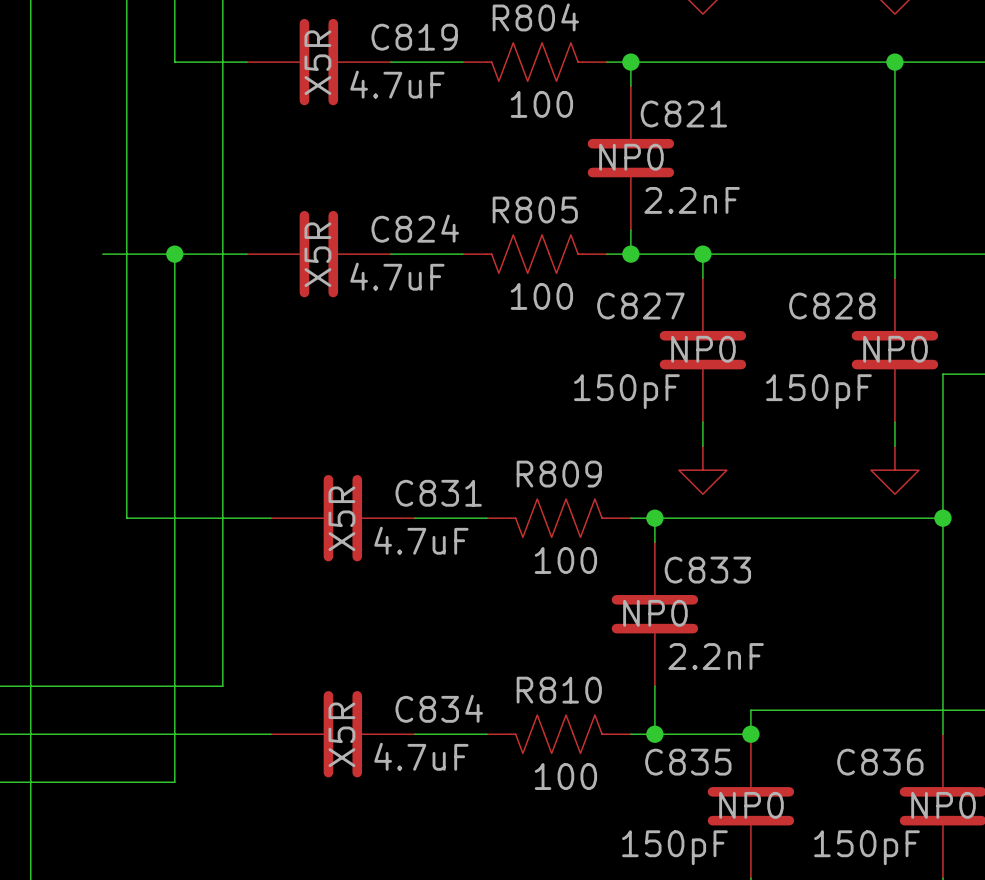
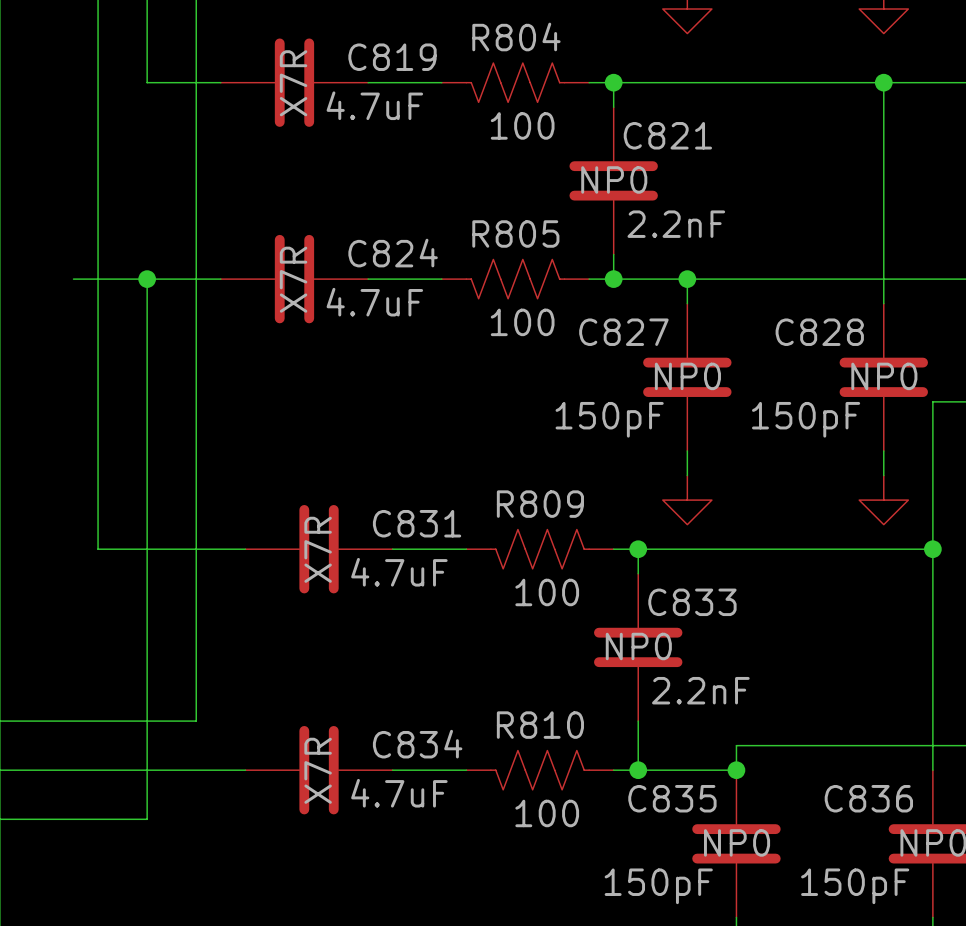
C819 text: X5R (317, 62) -> X7R (293, 83)
C824 text: X5R (317, 254) -> X7R (293, 279)
C831 text: X5R (341, 518) -> X7R (318, 549)
C834 text: X5R (341, 734) -> X7R (318, 770)

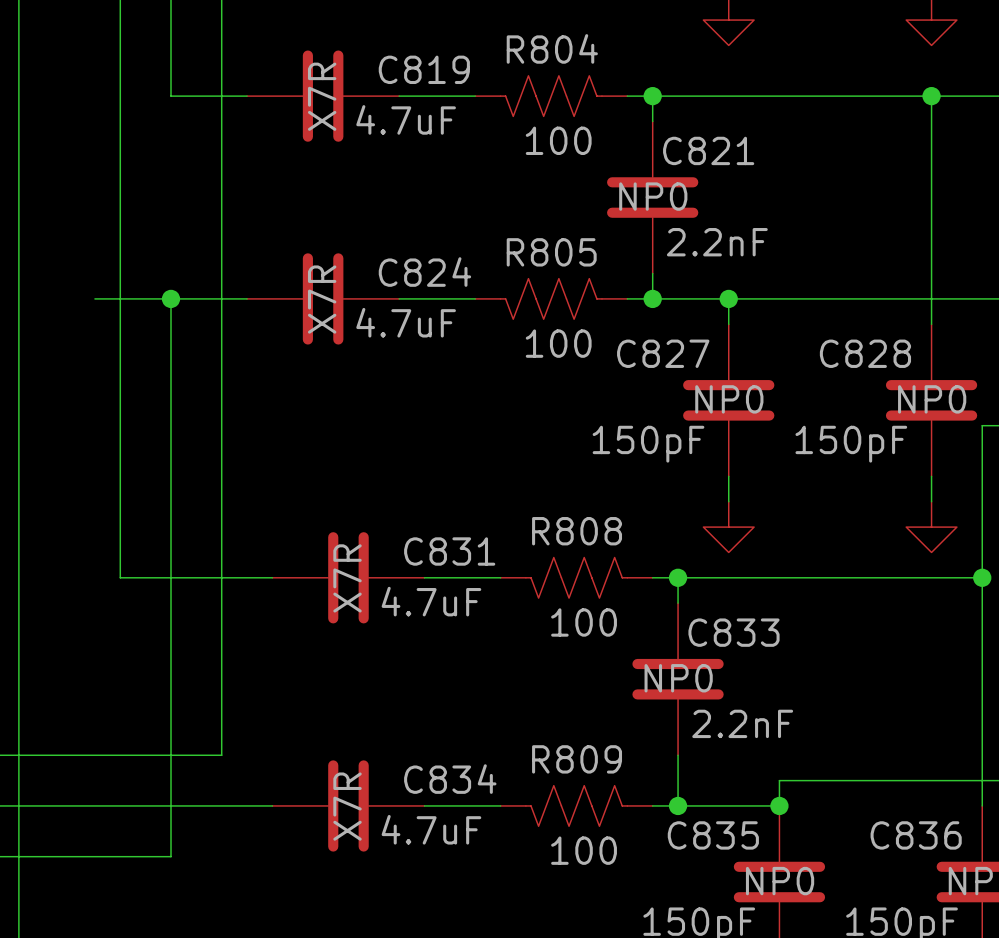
R809 name: R809 (540, 504) -> R808 (577, 531)
R810 name: R810 (540, 725) -> R809 (577, 759)

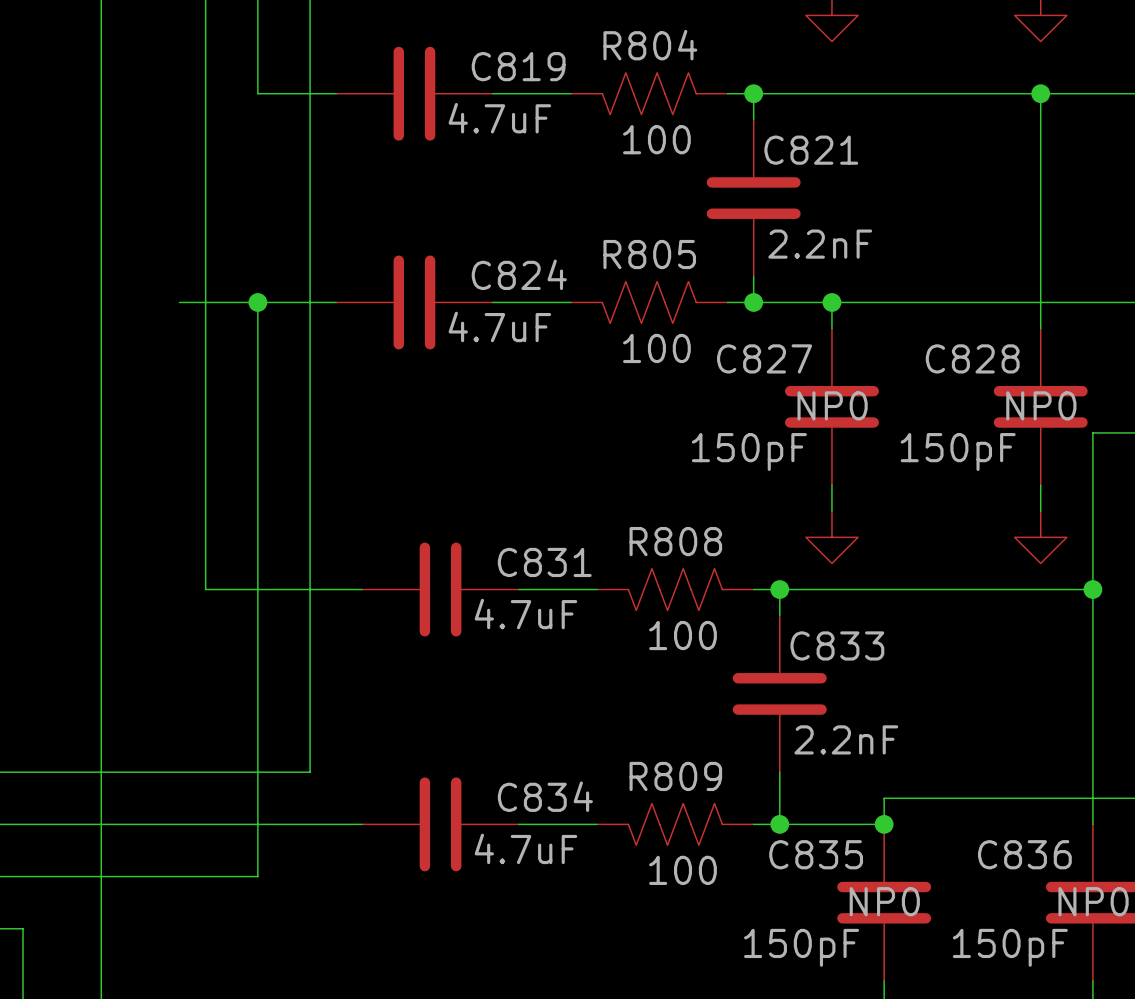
C819 text: X7R (322, 96) -> none
C821 text: NP0 (653, 196) -> none
C824 text: X7R (322, 299) -> none
C831 text: X7R (347, 578) -> none
C833 text: NP0 (678, 678) -> none
C834 text: X7R (347, 806) -> none

